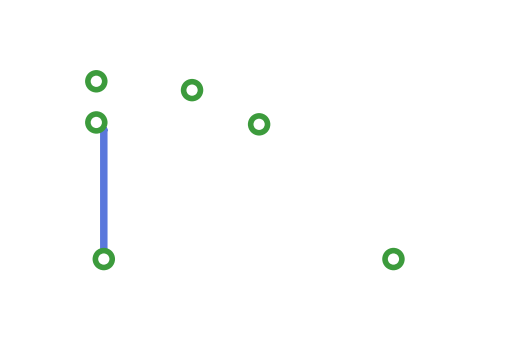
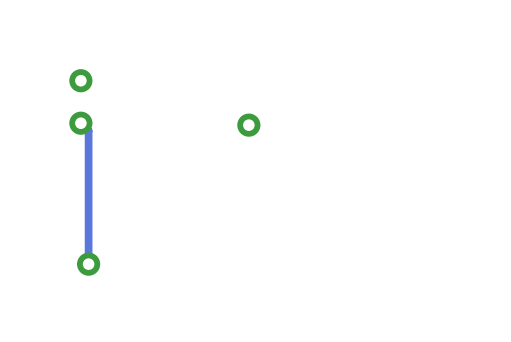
via: (192, 90) -> none
via: (393, 259) -> none

